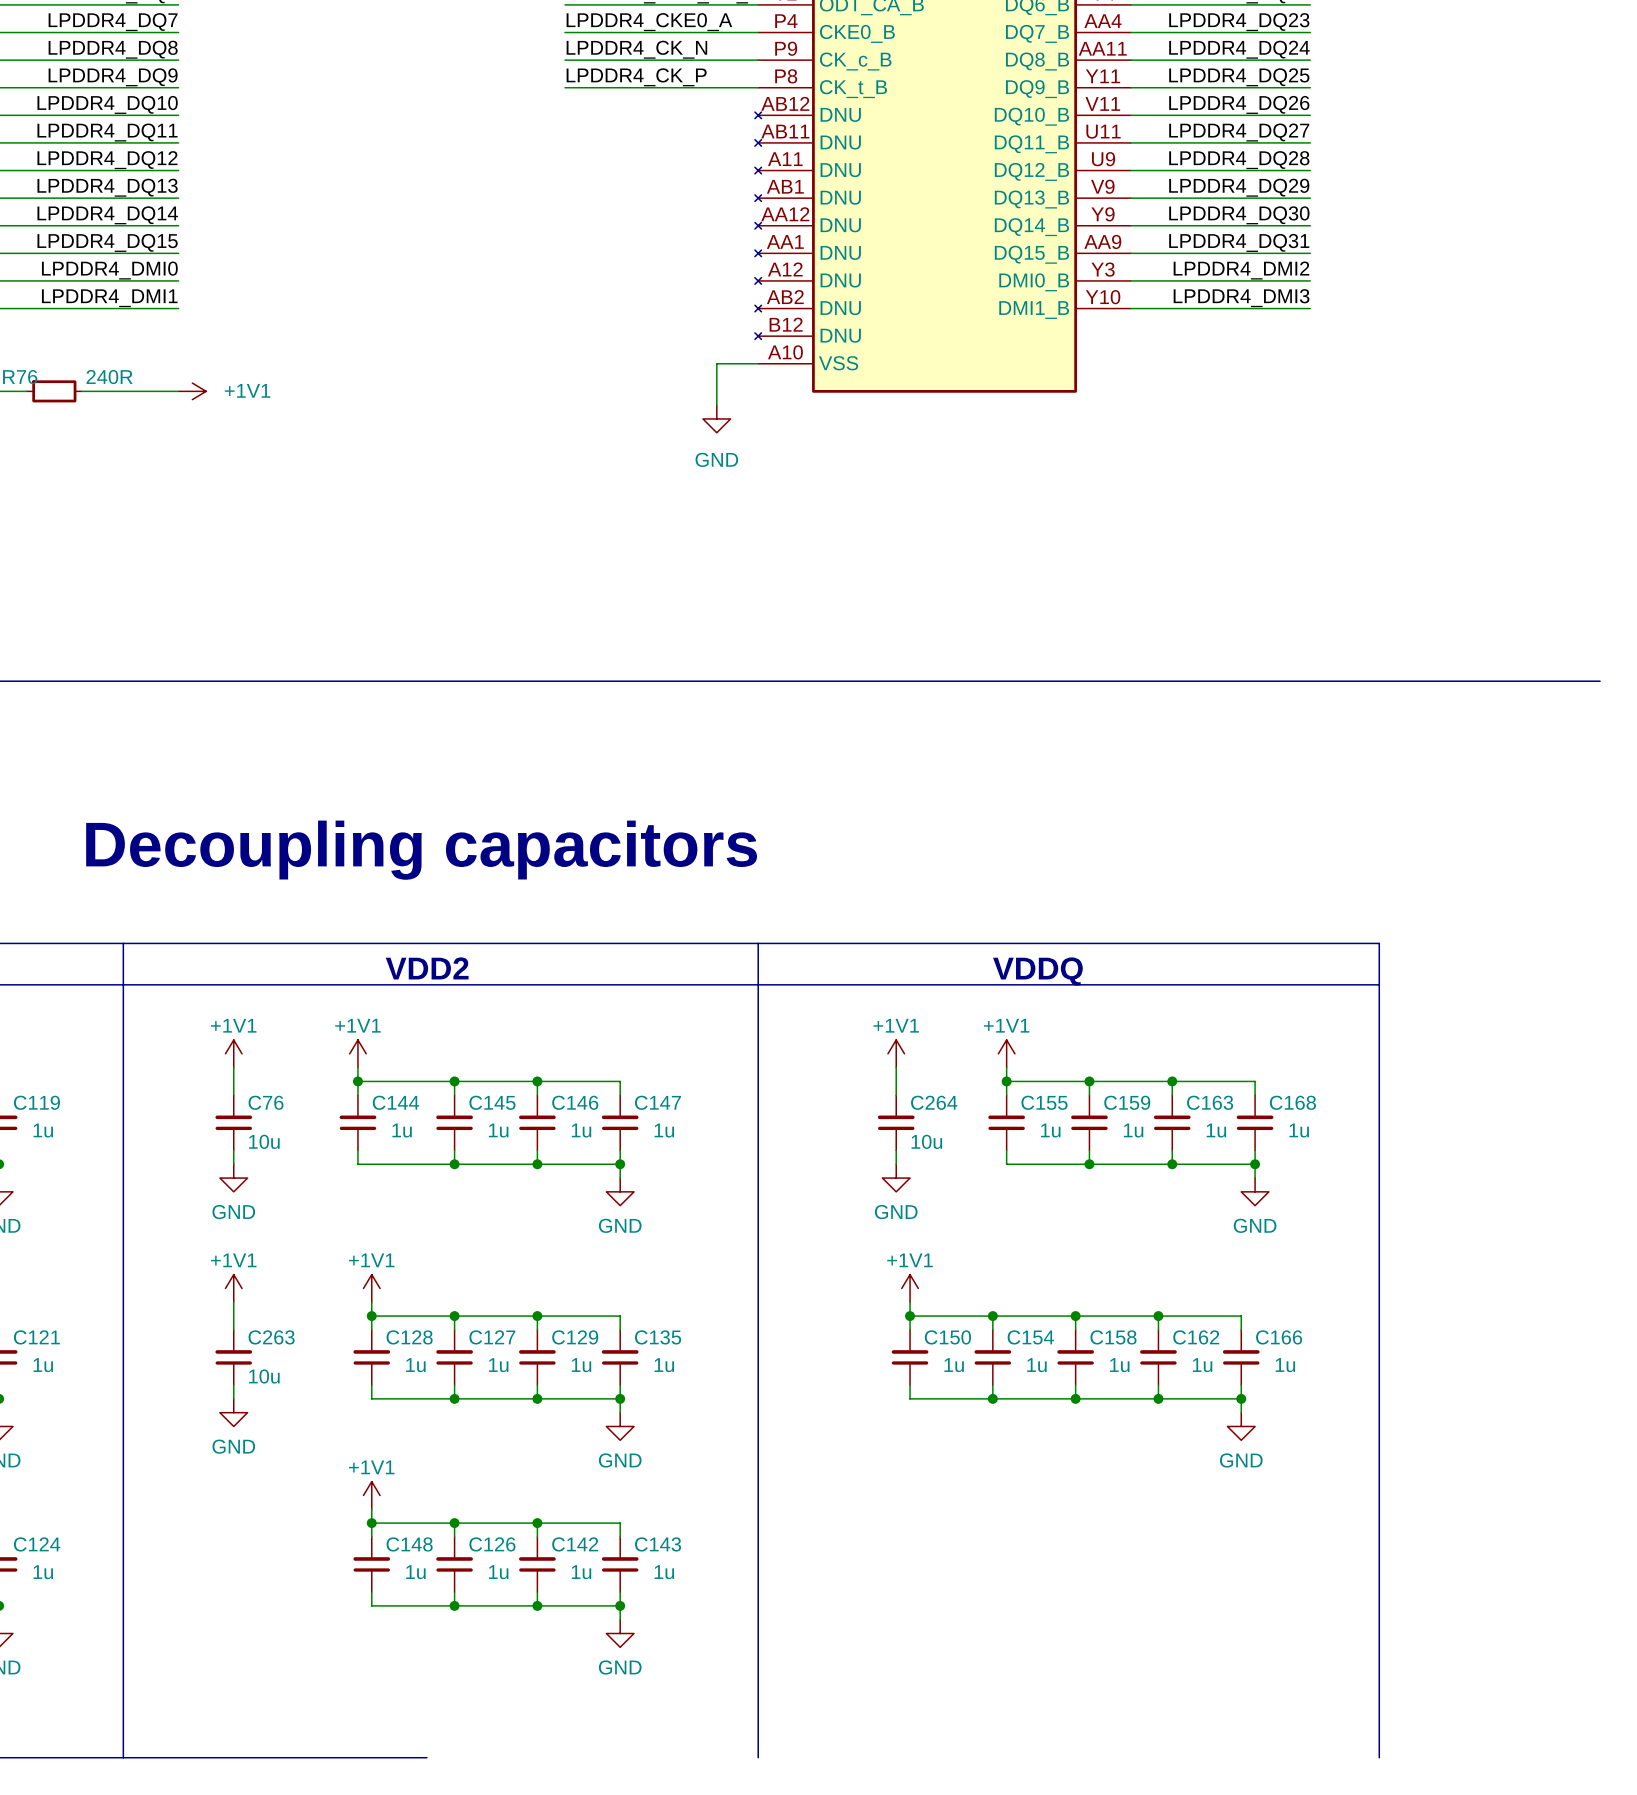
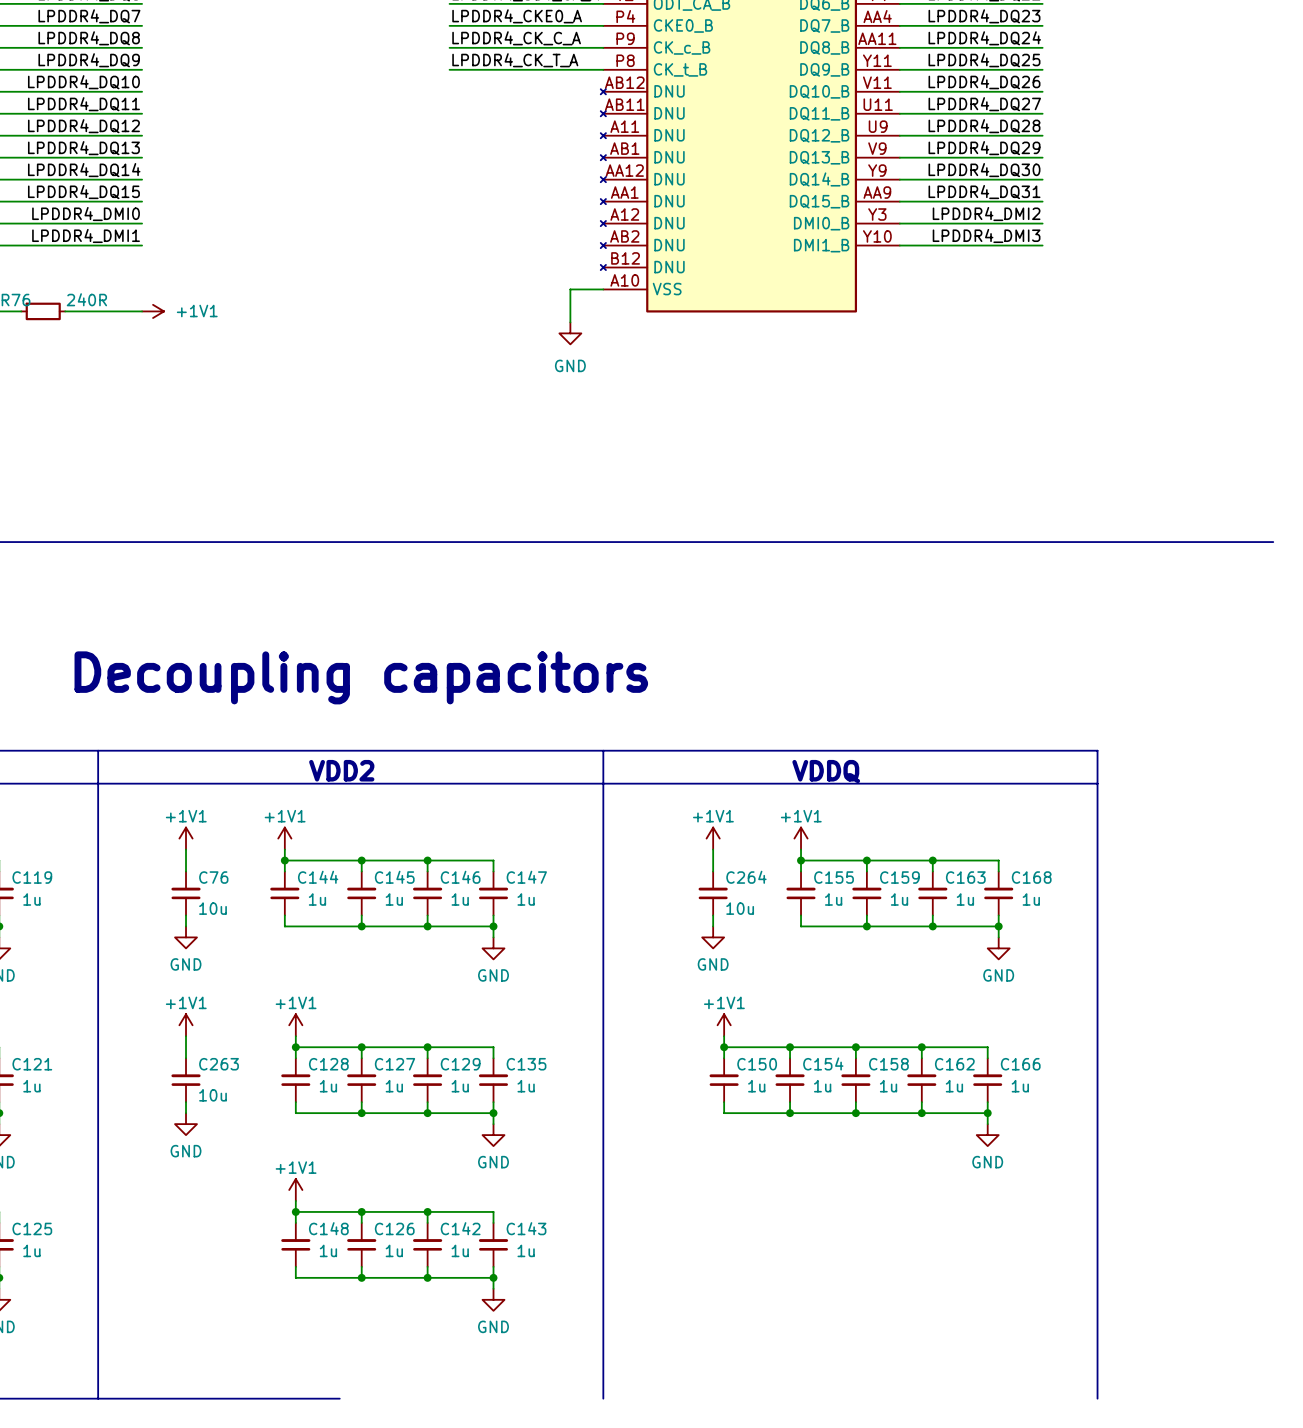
label: LPDDR4_CK_N (636, 49) -> LPDDR4_CK_C_A (516, 38)
label: LPDDR4_CK_P (636, 77) -> LPDDR4_CK_T_A (515, 60)
C124 name: C124 (37, 1544) -> C125 (32, 1228)

